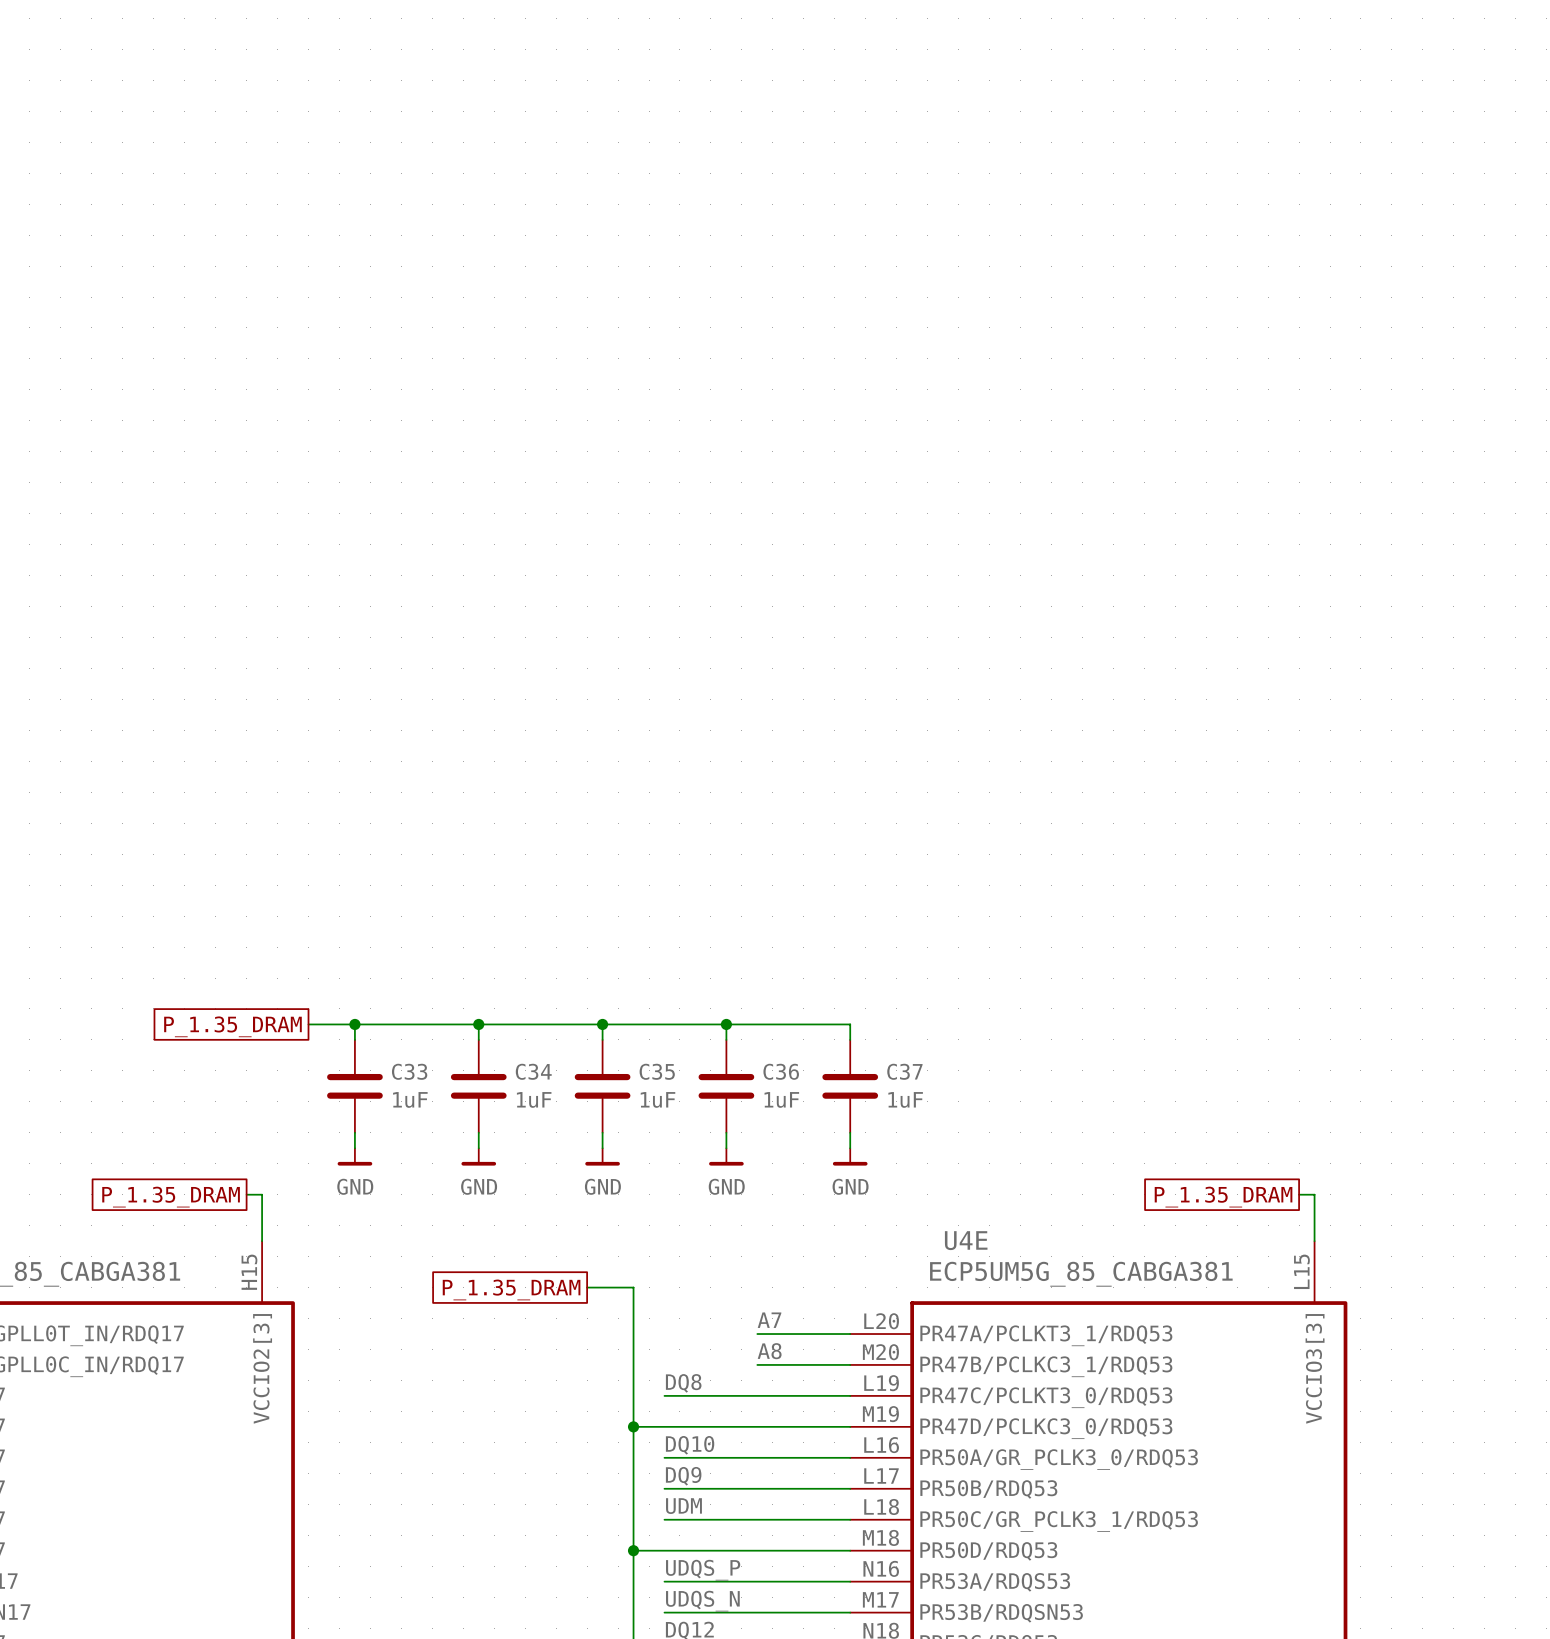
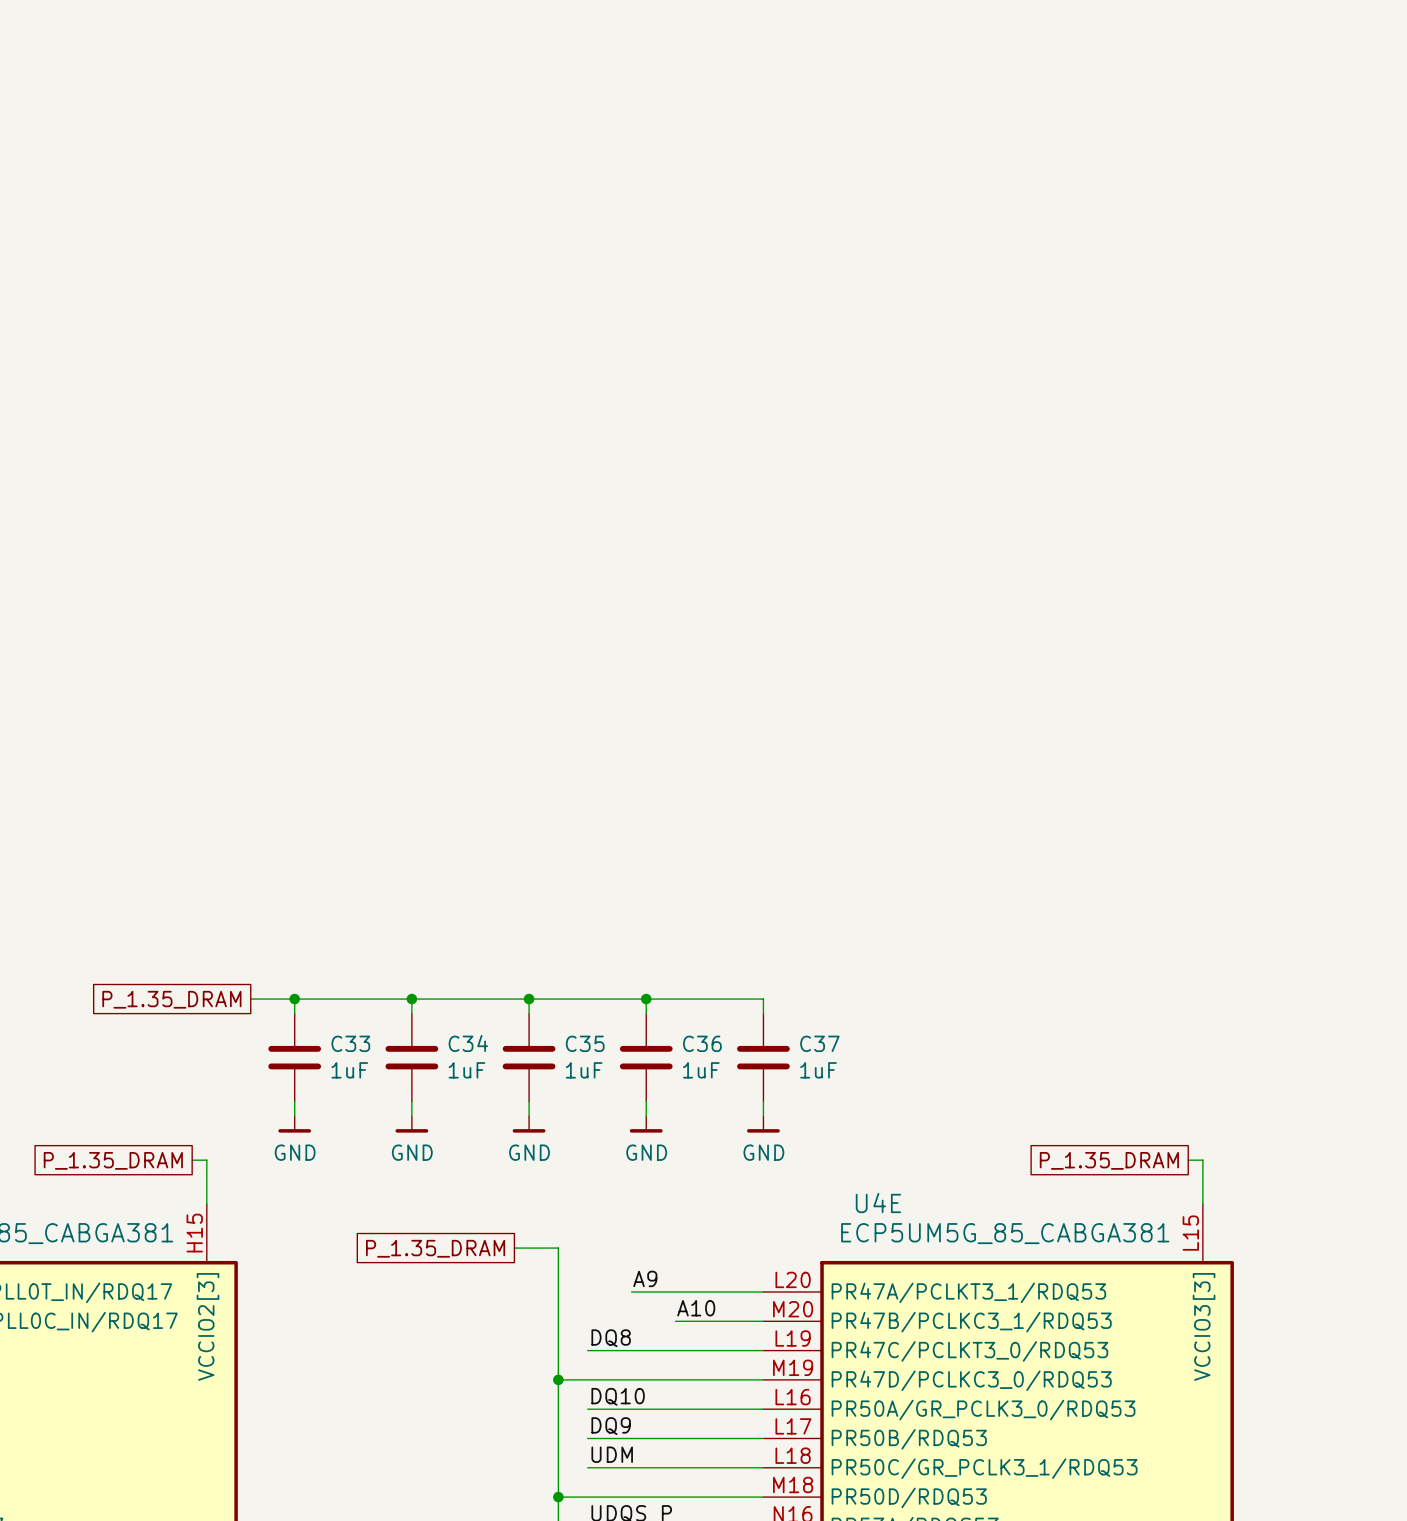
label: none -> A9 (645, 1278)
label: A7 (769, 1320) -> none
wire: none -> (631, 1292) (675, 1292)
label: A8 (769, 1351) -> A10 (696, 1308)

